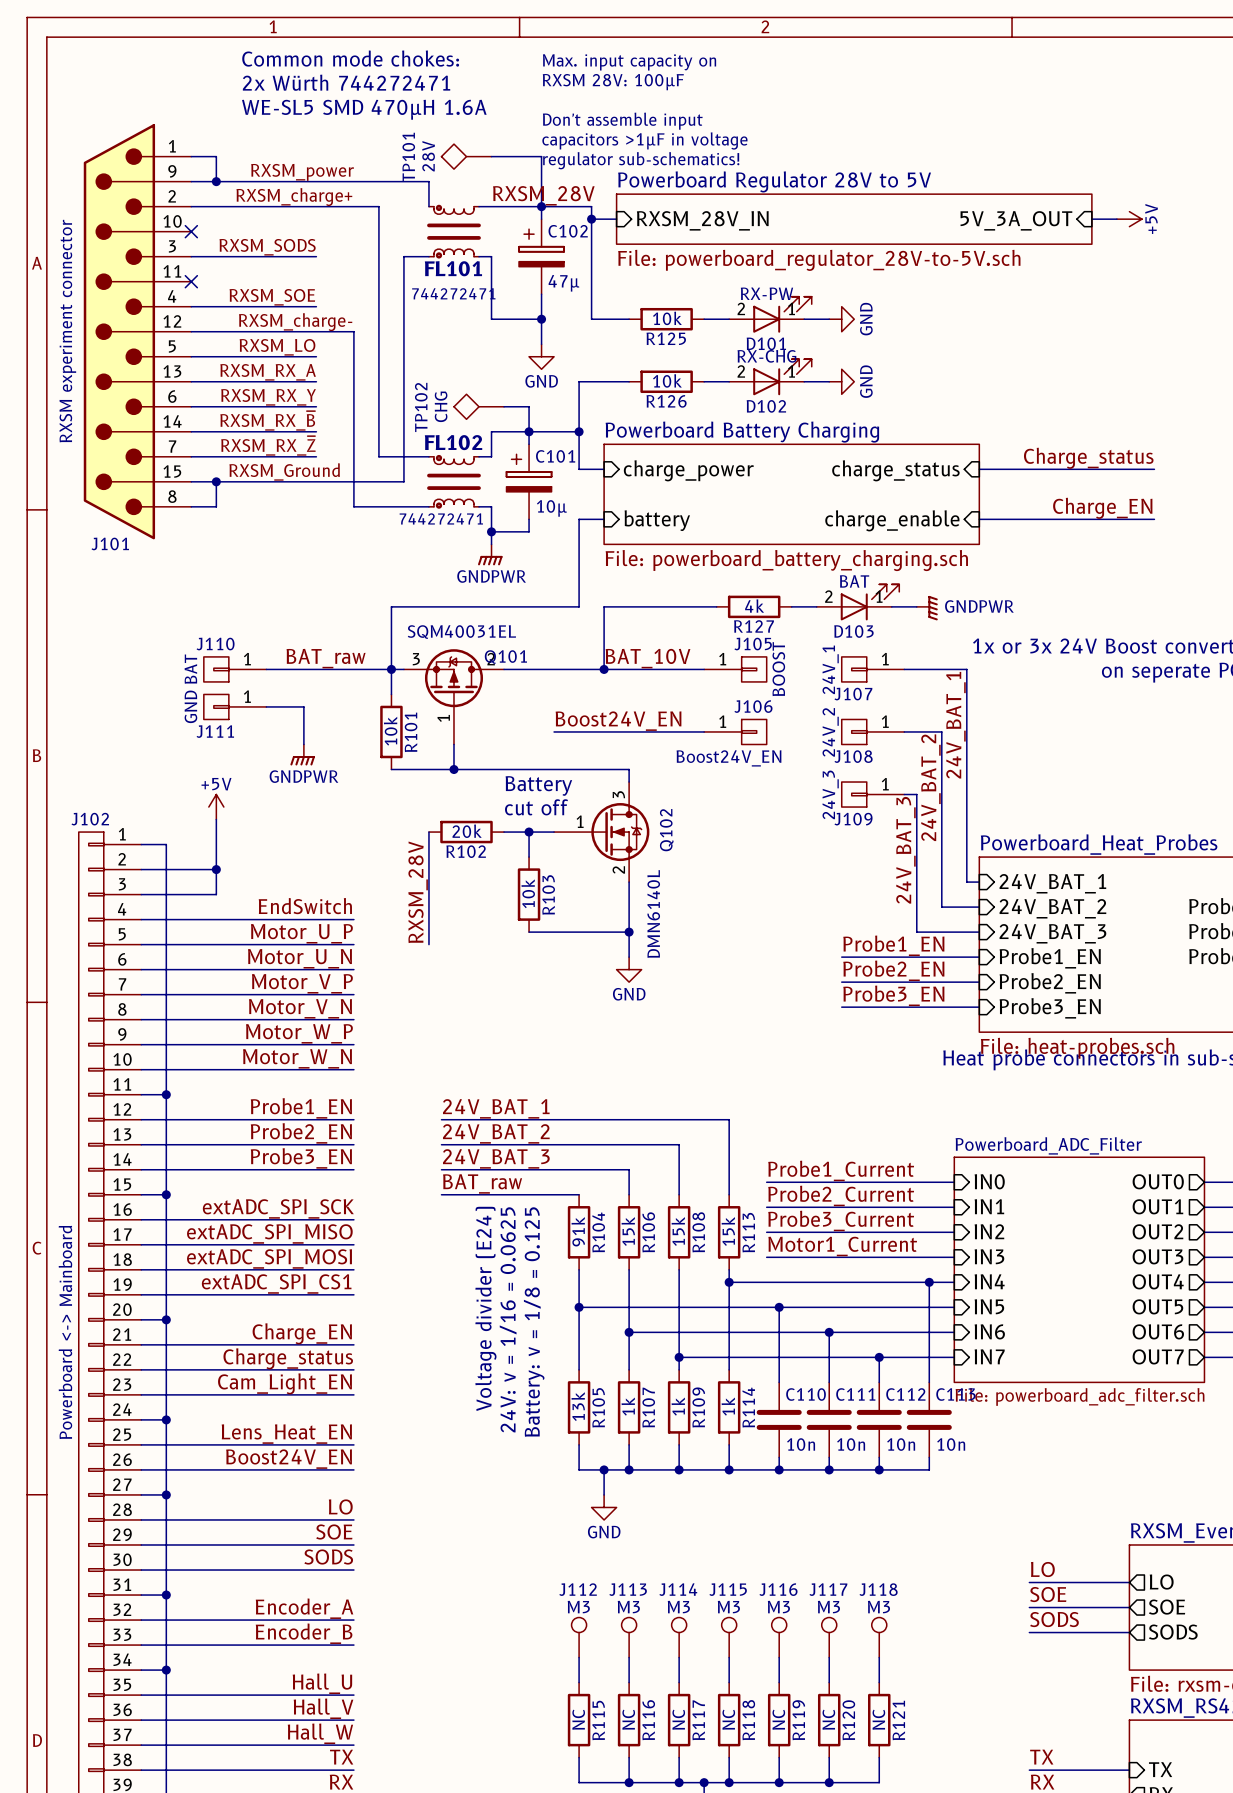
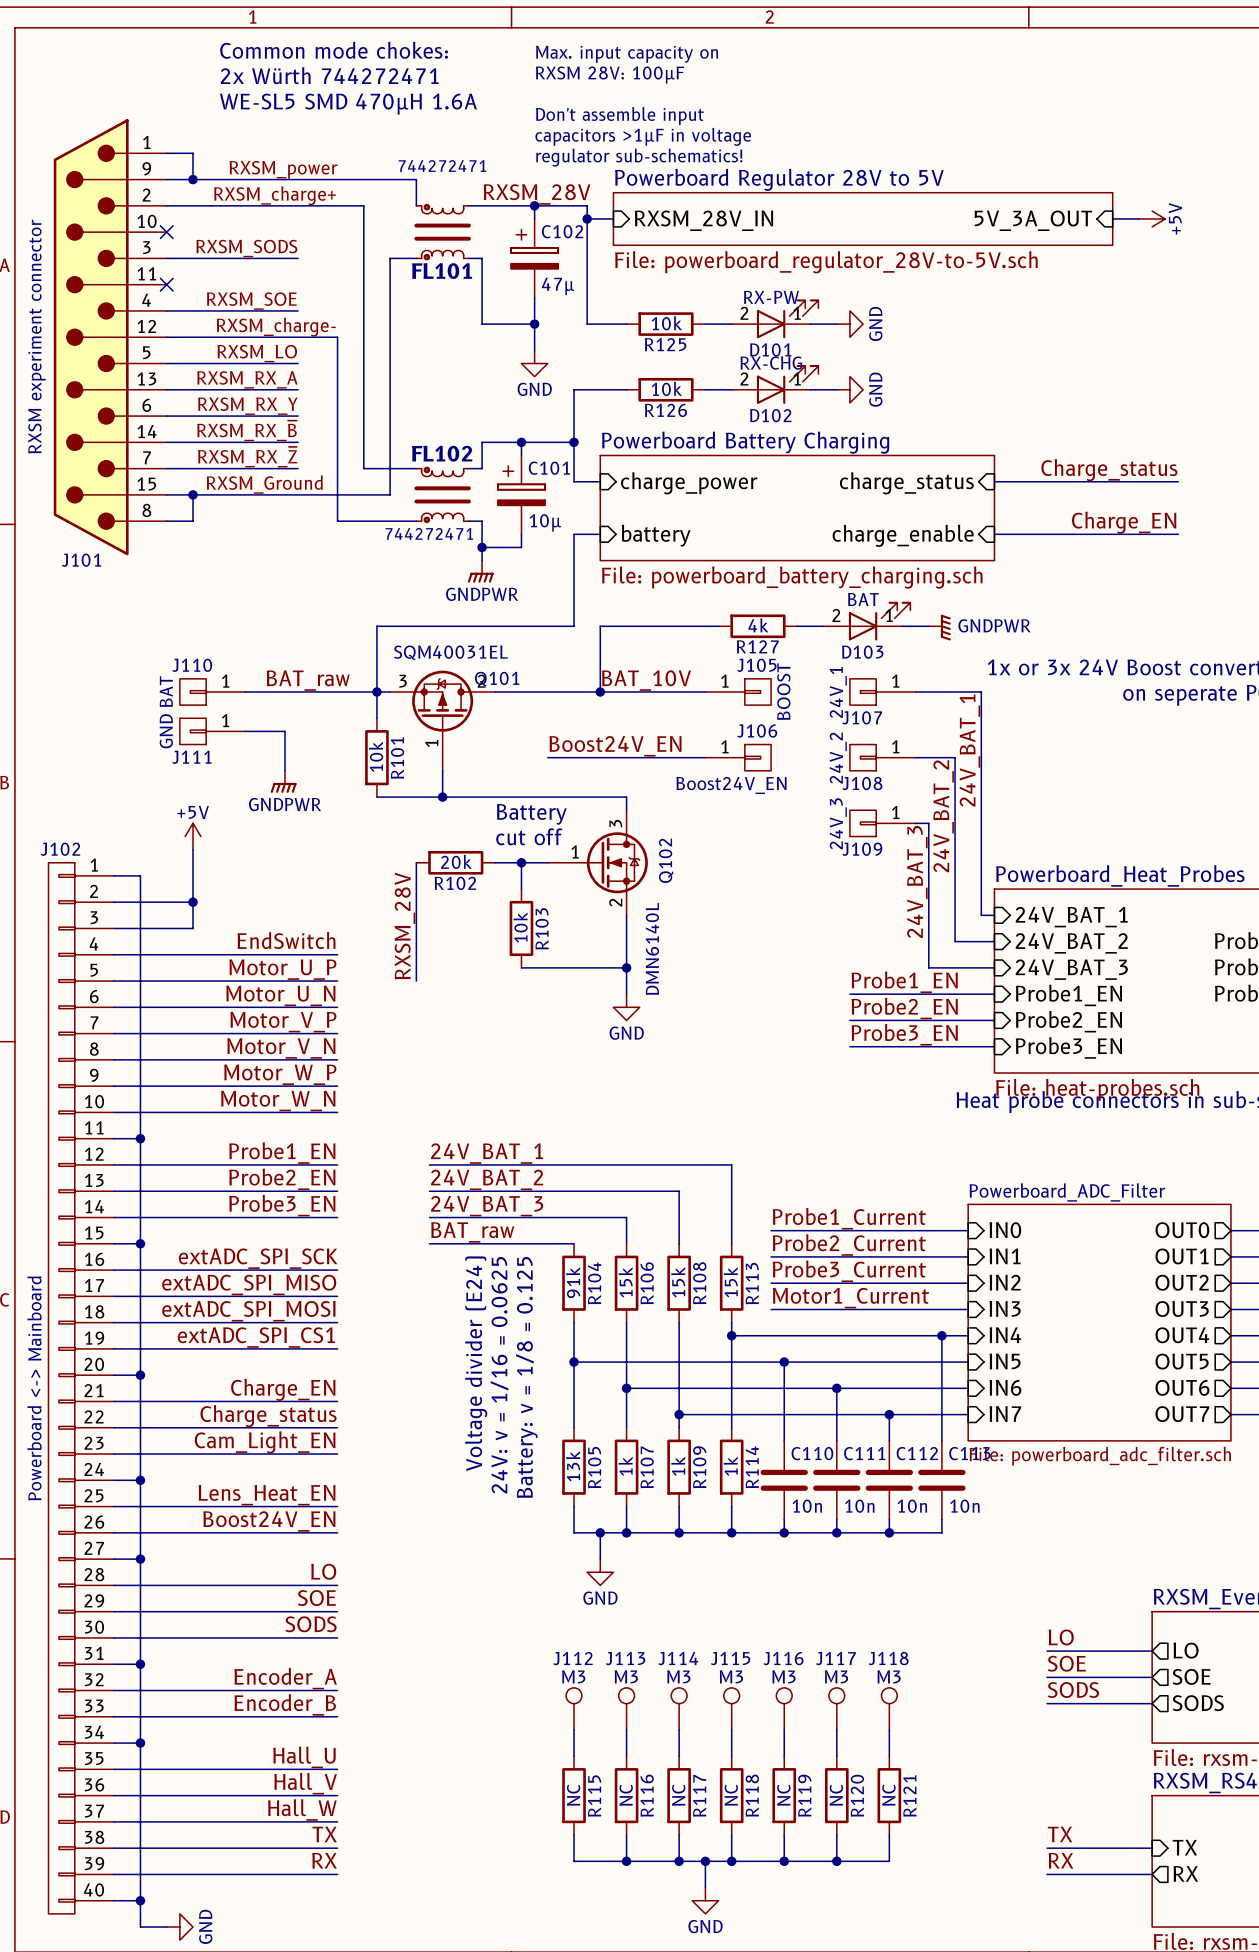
TP101: 28V (466, 156) -> none
wire: (491, 156) (541, 156) (541, 206) -> none
FL101 value position: 744272471 (453, 293) -> 744272471 (442, 165)
TP102: CHG (479, 406) -> none
wire: (504, 406) (529, 406) (529, 431) -> none

